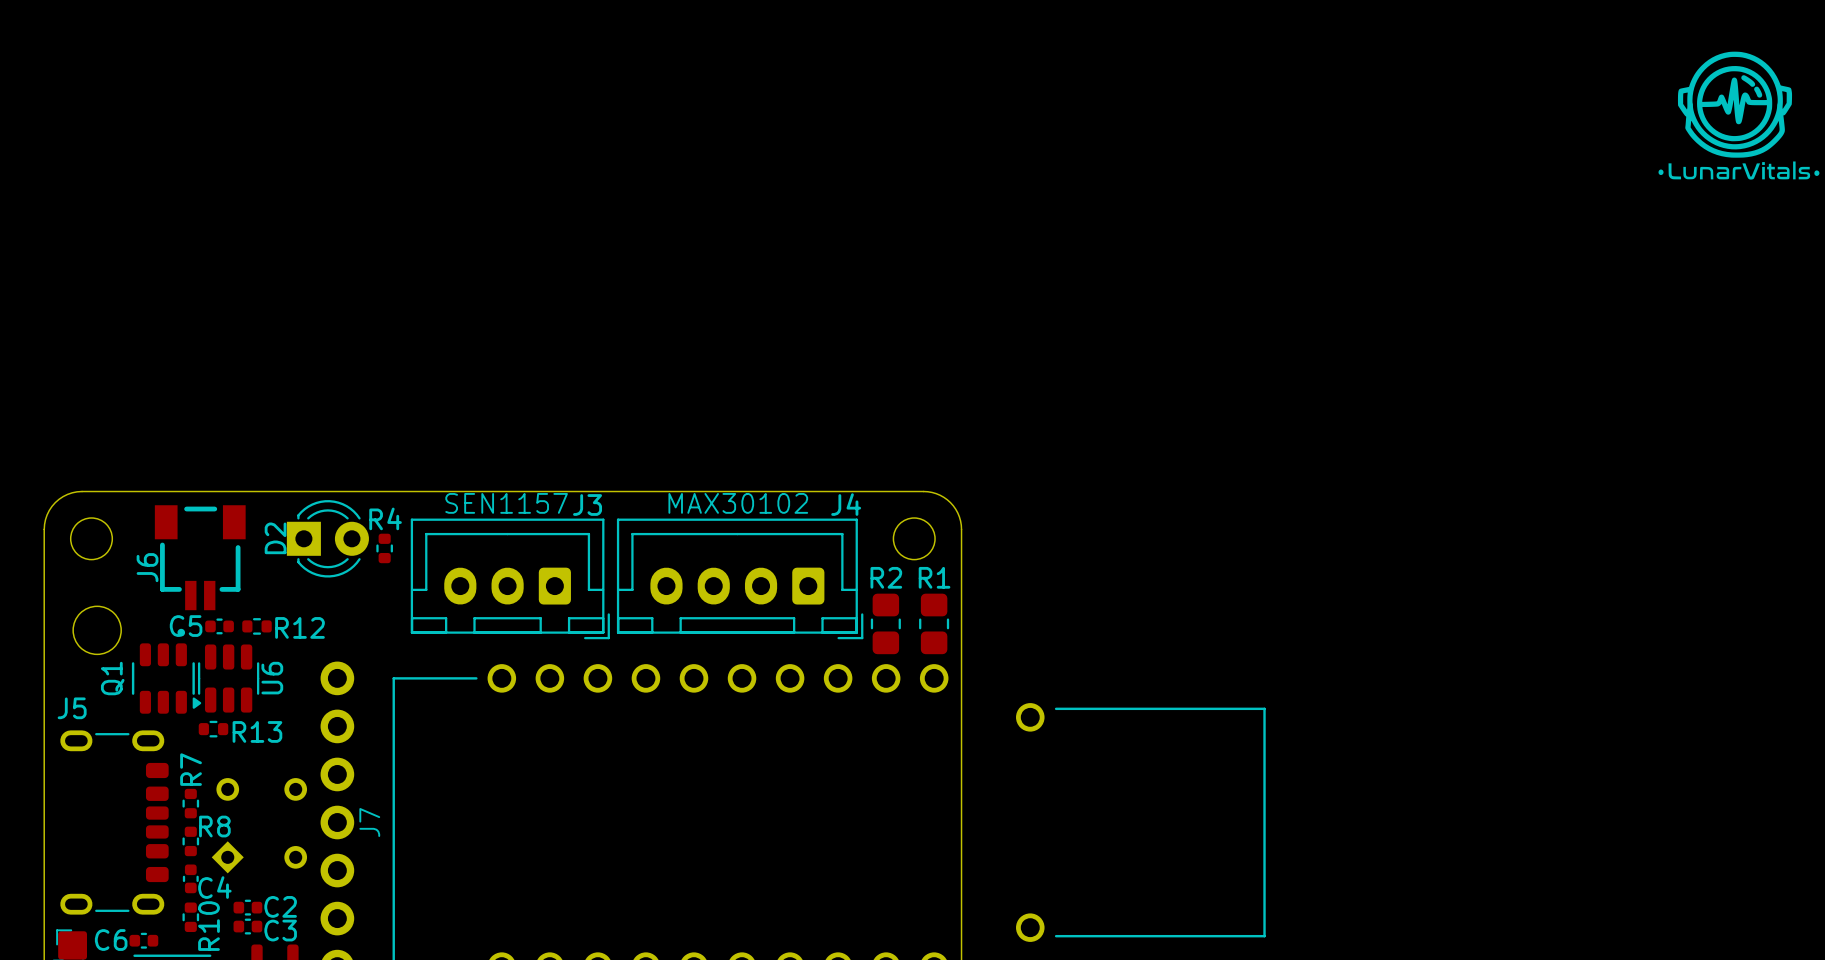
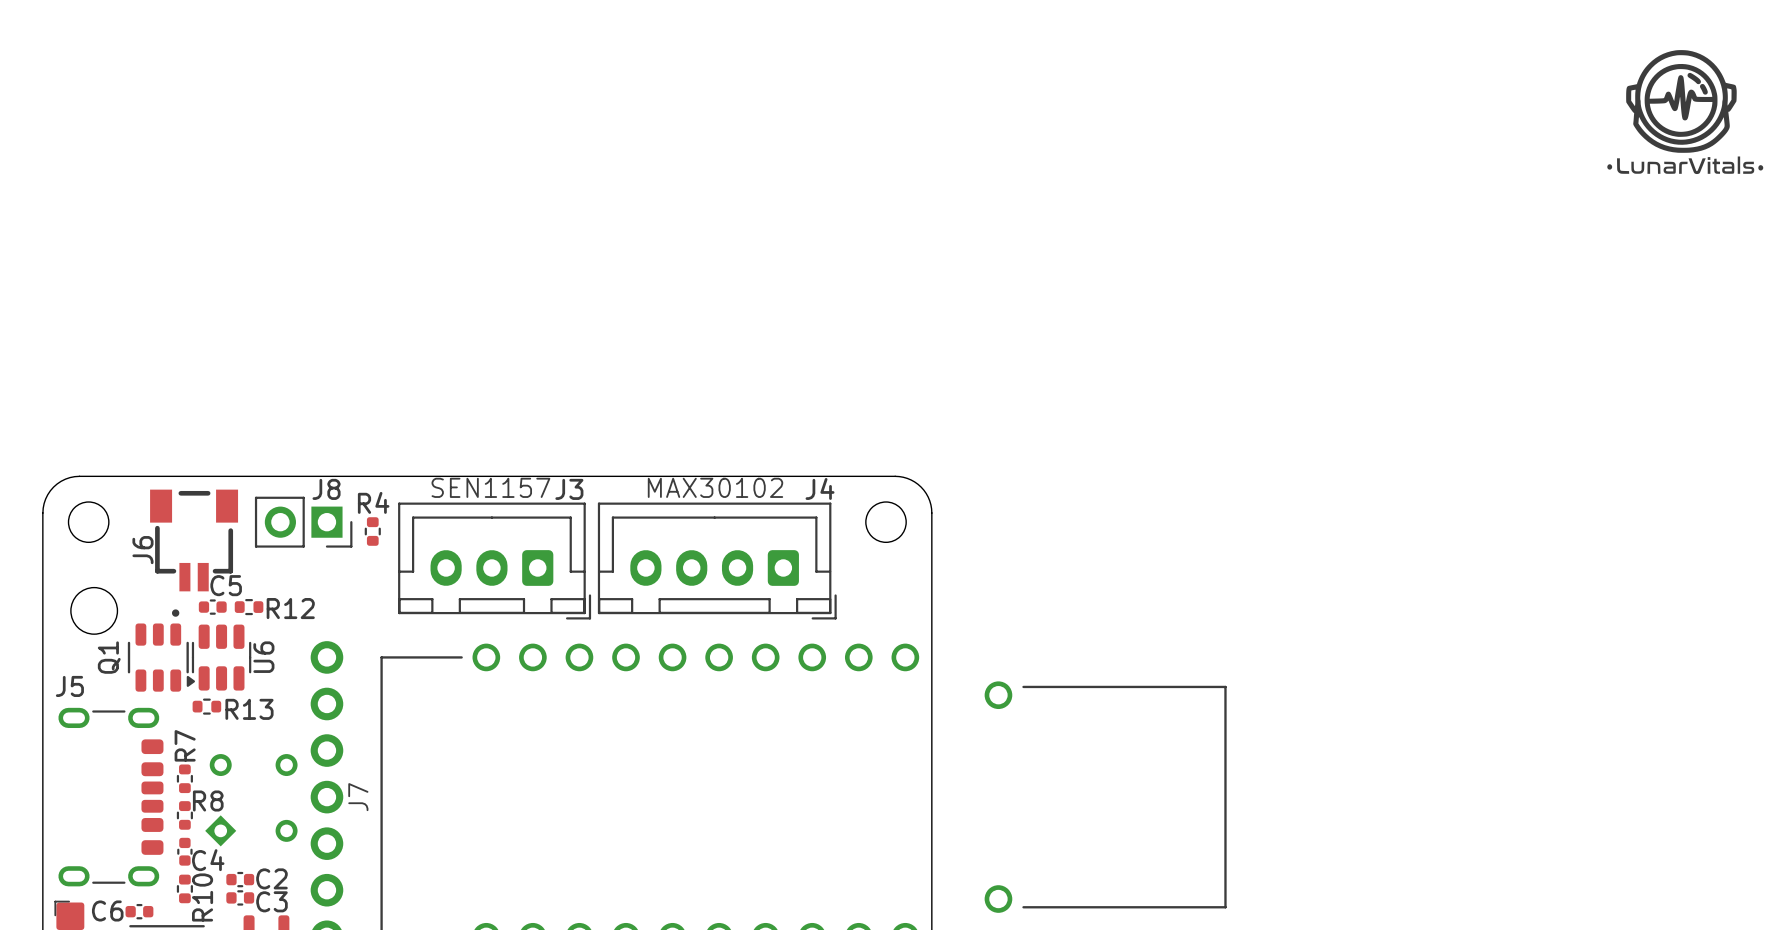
J8: none -> (303, 522)
D2: (327, 538) -> none
R2: (885, 623) -> none
R1: (934, 623) -> none
C5 name position: C5 (186, 626) -> C5 (226, 585)

